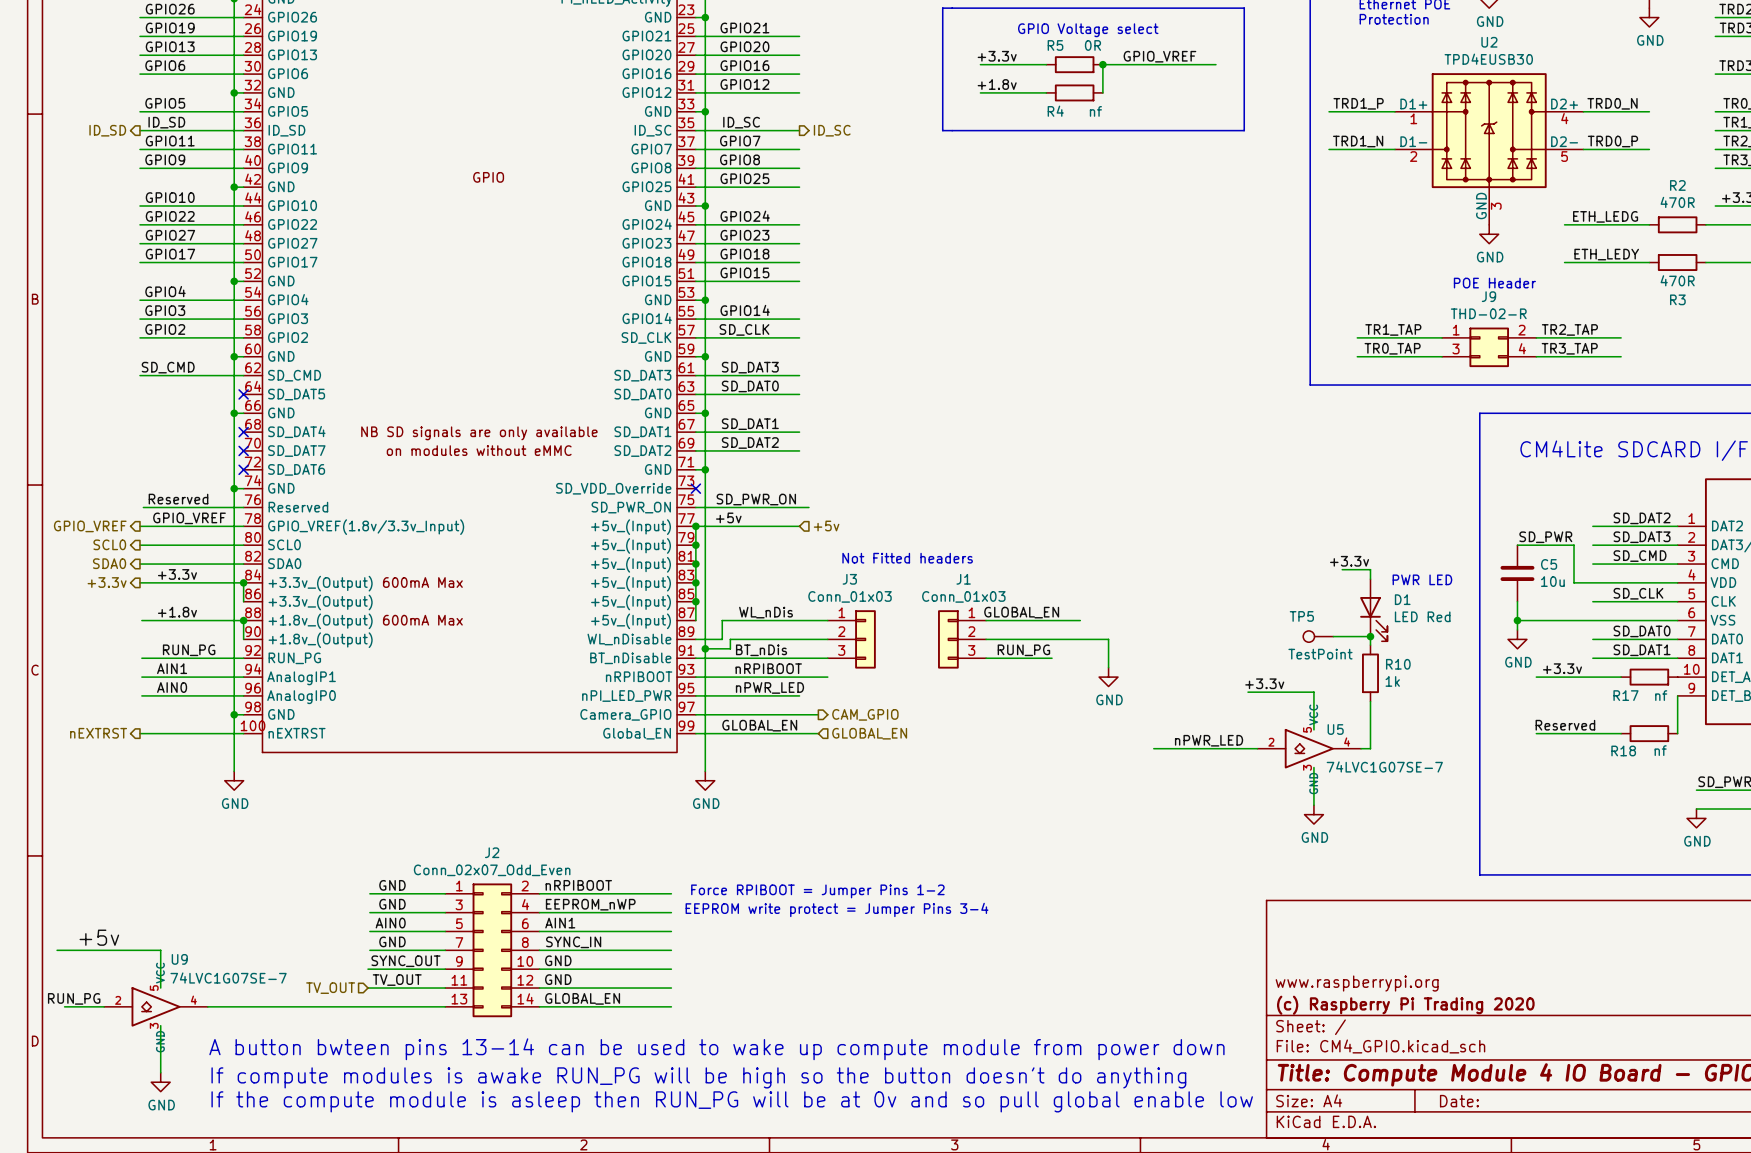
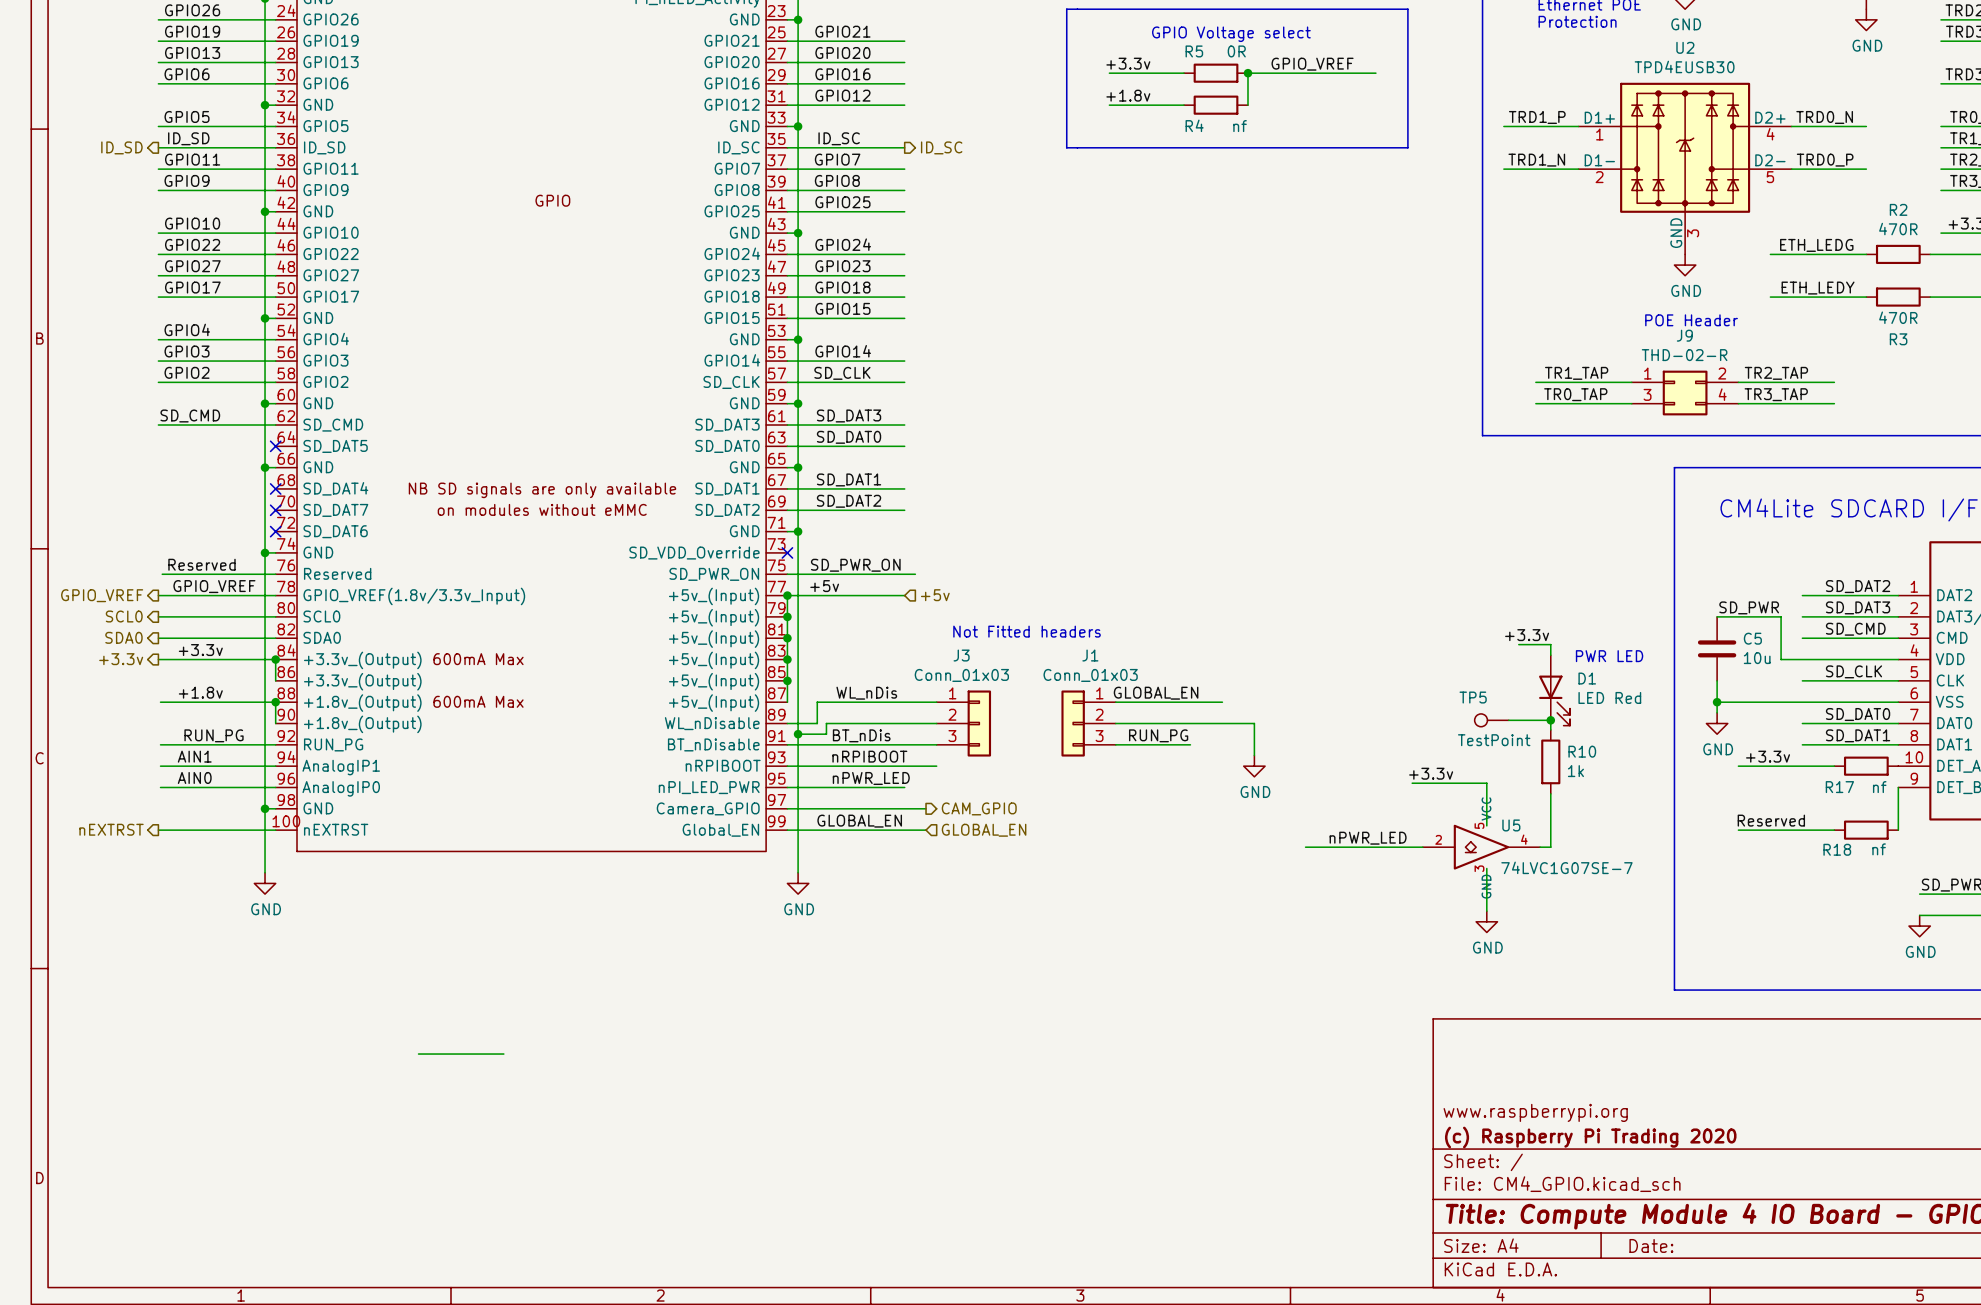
label: GND (392, 885) -> none
label: nRPIBOOT (578, 885) -> none
text: Force RPIBOOT = Jumper Pins 1-2 (817, 891) -> none
wire: (369, 893) (445, 893) -> none
wire: (539, 893) (671, 893) -> none
label: GND (392, 904) -> none
label: EEPROM_nWP (590, 904) -> none
text: EEPROM write protect = Jumper Pins 3-4 (837, 909) -> none
wire: (369, 912) (445, 912) -> none
wire: (539, 912) (671, 912) -> none
label: AIN0 (390, 923) -> none
label: AIN1 (560, 923) -> none
wire: (539, 931) (671, 931) -> none
label: +5v (99, 937) -> none
label: GND (392, 941) -> none
label: SYNC_IN (573, 942) -> none
wire: (57, 950) (160, 950) (160, 988) -> none
wire: (369, 950) (445, 950) -> none
J2: Conn_02x07_Odd_Even (492, 950) -> none
wire: (539, 950) (671, 950) -> none
label: GND (558, 960) -> none
label: SYNC_OUT (405, 961) -> none
wire: (368, 969) (445, 969) -> none
wire: (539, 969) (671, 969) -> none
label: GND (558, 979) -> none
label: TV_OUT (397, 980) -> none
hierarchical label: TV_OUT (330, 988) -> none
wire: (368, 988) (445, 988) -> none
wire: (539, 988) (671, 988) -> none
label: RUN_PG (74, 998) -> none
label: GLOBAL_EN (582, 998) -> none
wire: (64, 1006) (104, 1006) -> none
U9: 74LVC1G07SE-7 (156, 1006) -> none
wire: (207, 1006) (445, 1006) -> none
wire: (539, 1006) (671, 1006) -> none
wire: (160, 1025) (160, 1072) -> none
text: A button bwteen pins 13-14 can be used to wake up compute module from power down (716, 1049) -> none
text: If compute modules is awake RUN_PG will be high so the button doesn't do anything (698, 1077) -> none
power symbol: GND (160, 1082) -> none
text: If the compute module is asleep then RUN_PG will be at 0v and so pull global enable low (732, 1101) -> none

